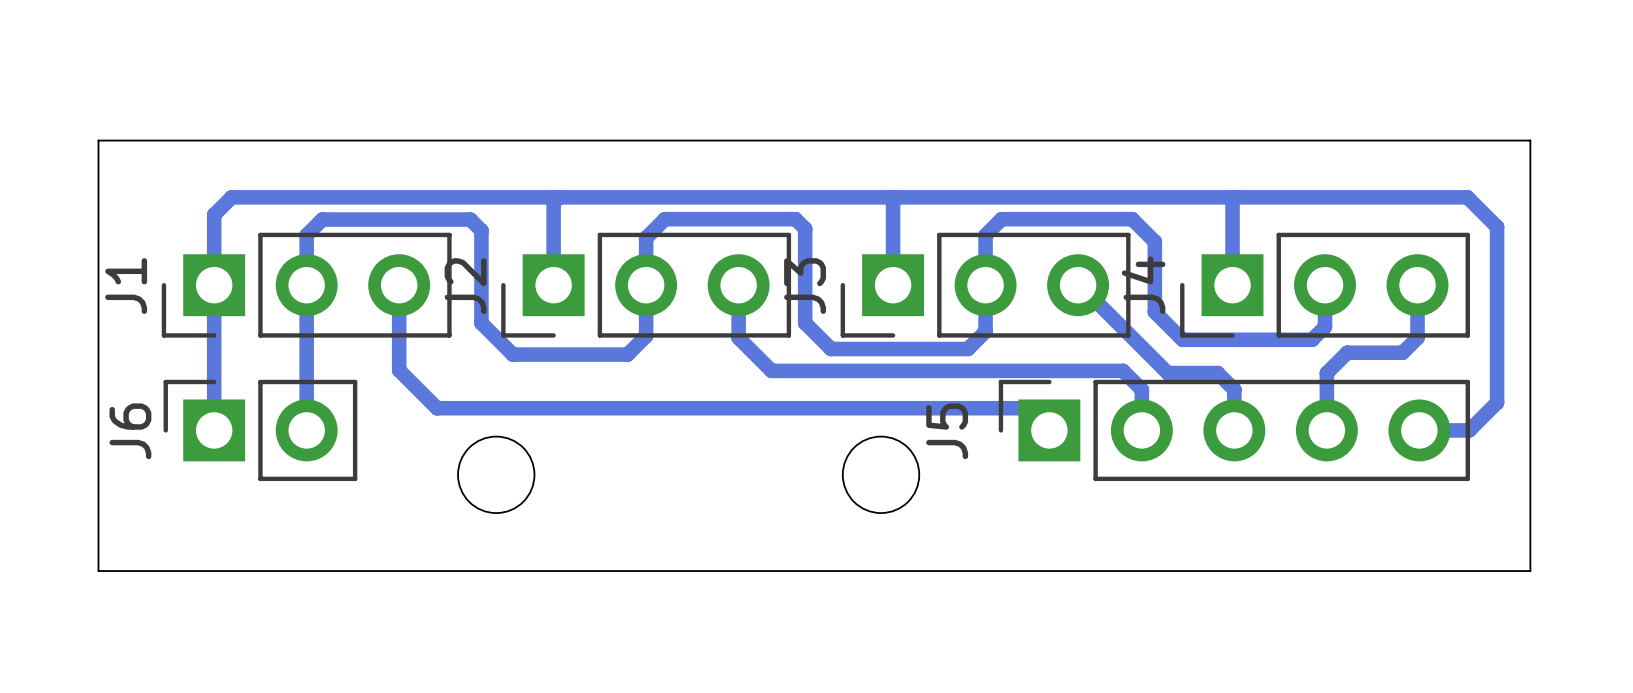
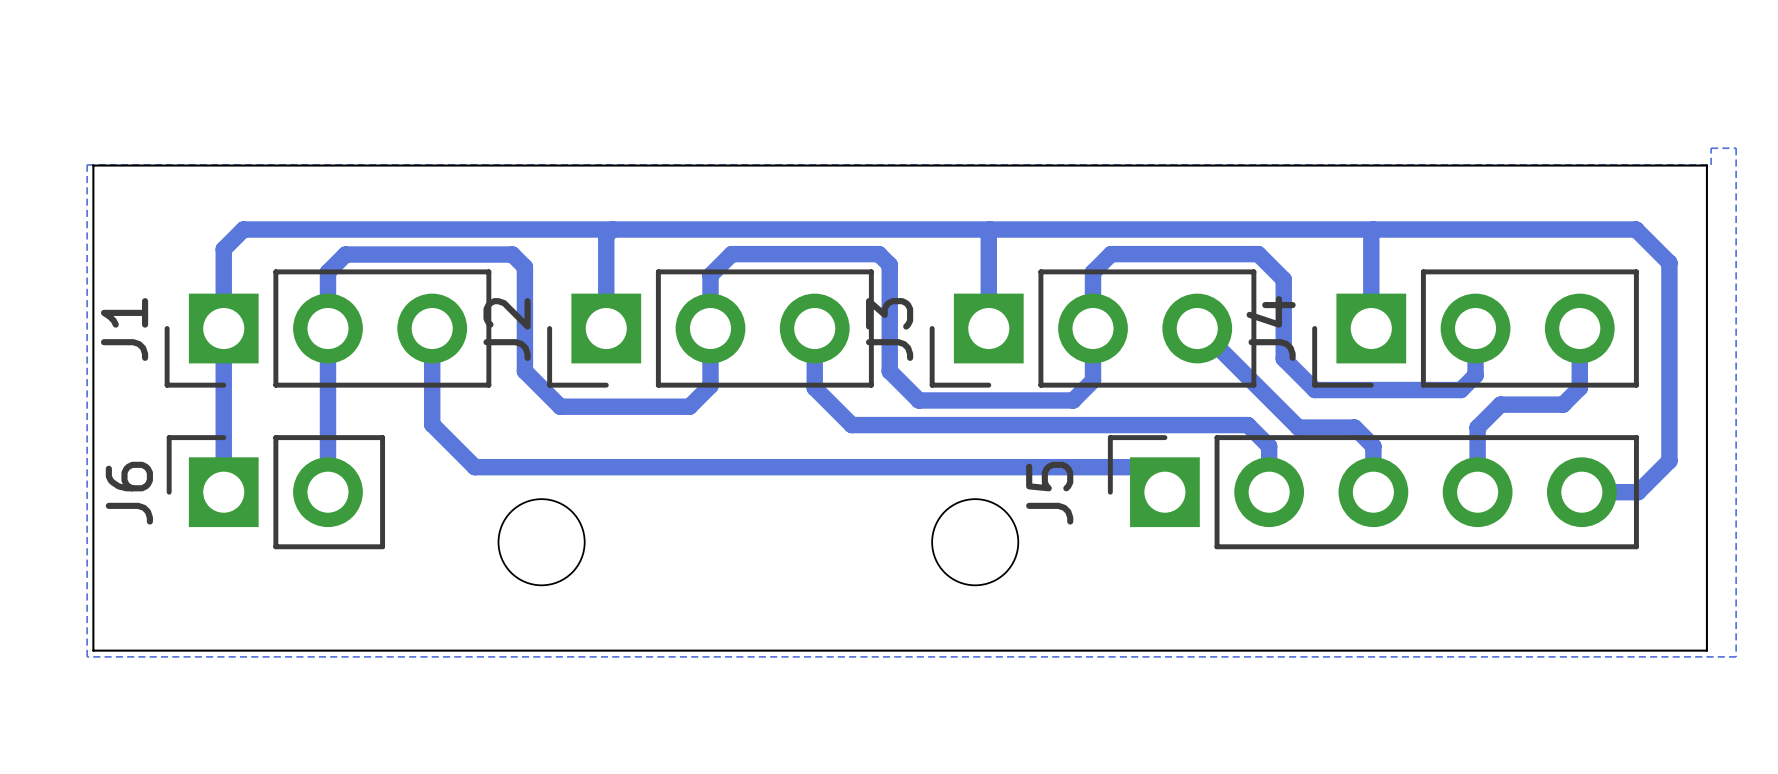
bottom zone outline: none -> (1711, 148) (1711, 164) (87, 164) (87, 656) (1736, 656) (1736, 148) (1711, 148)

